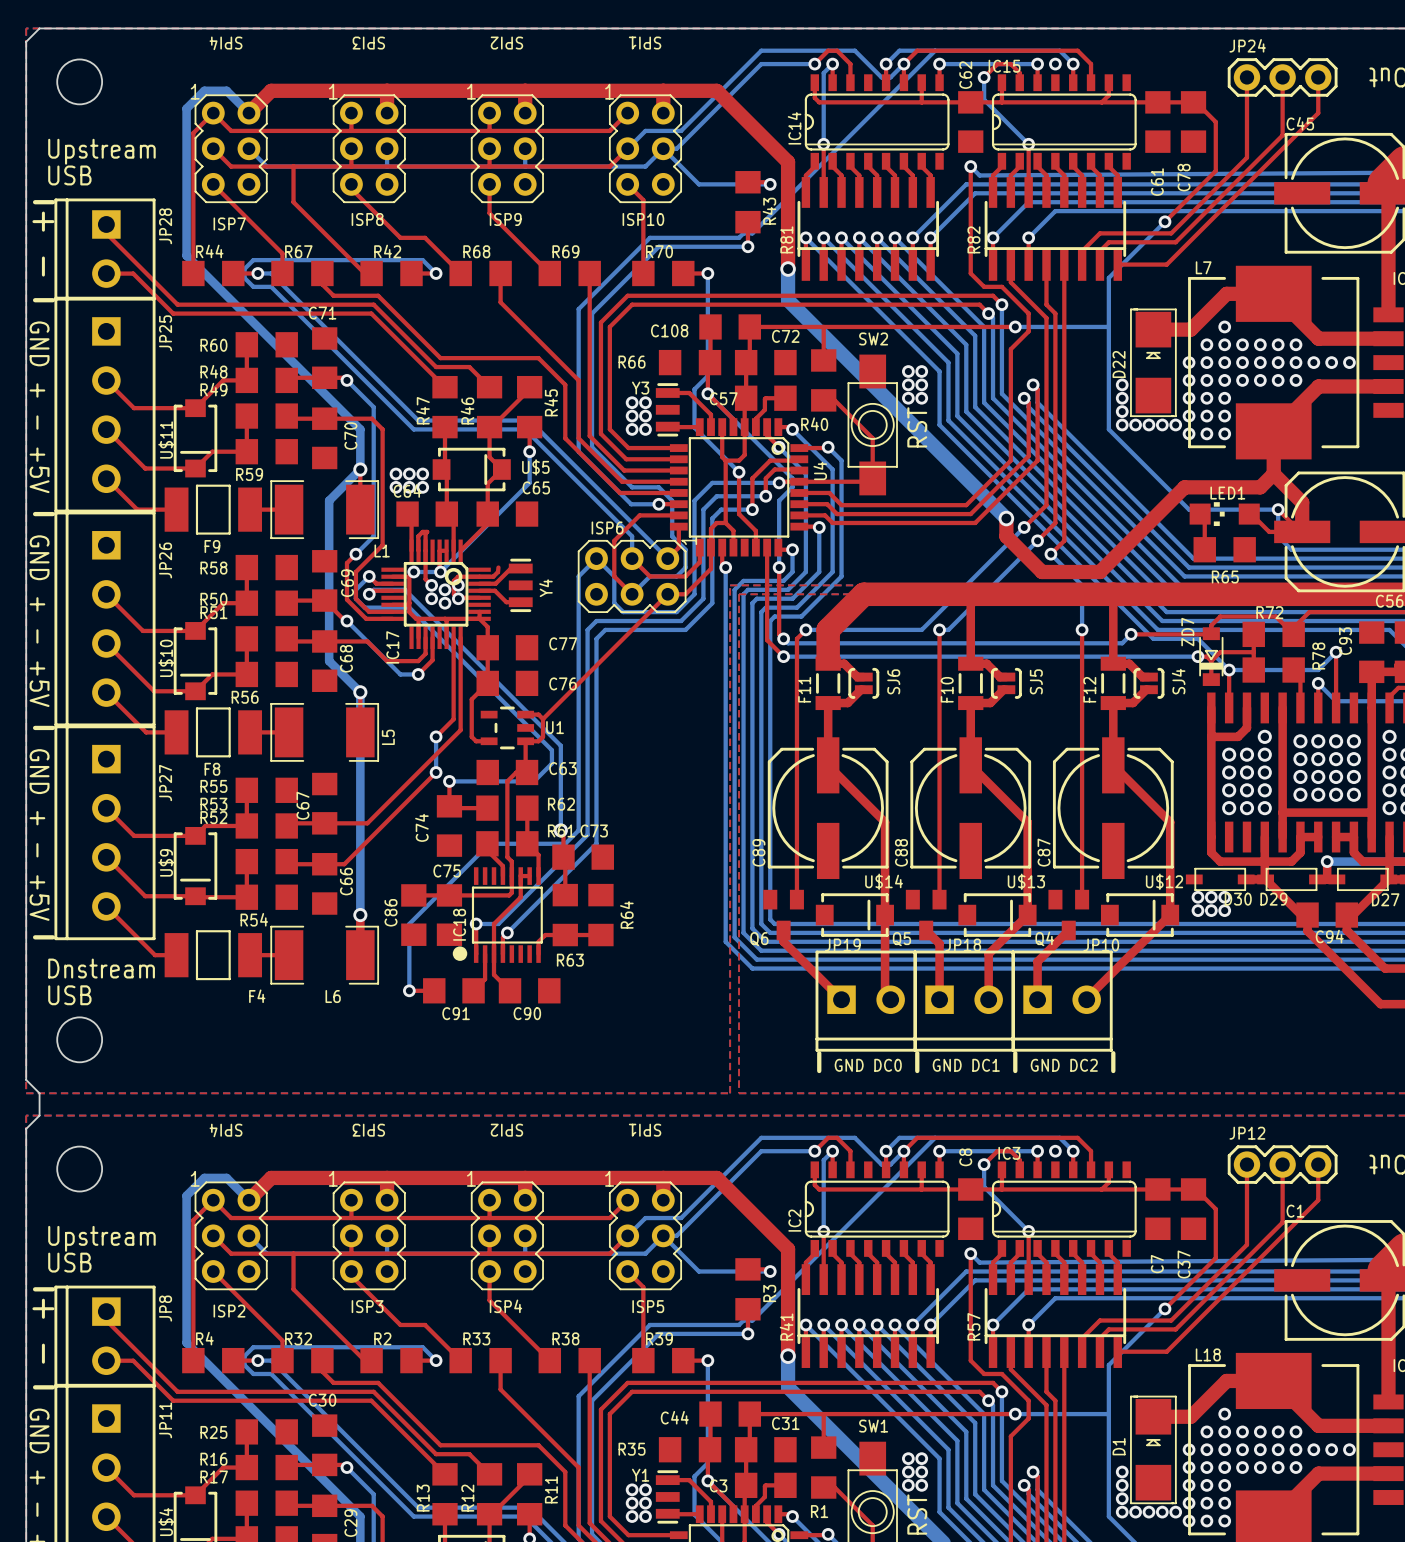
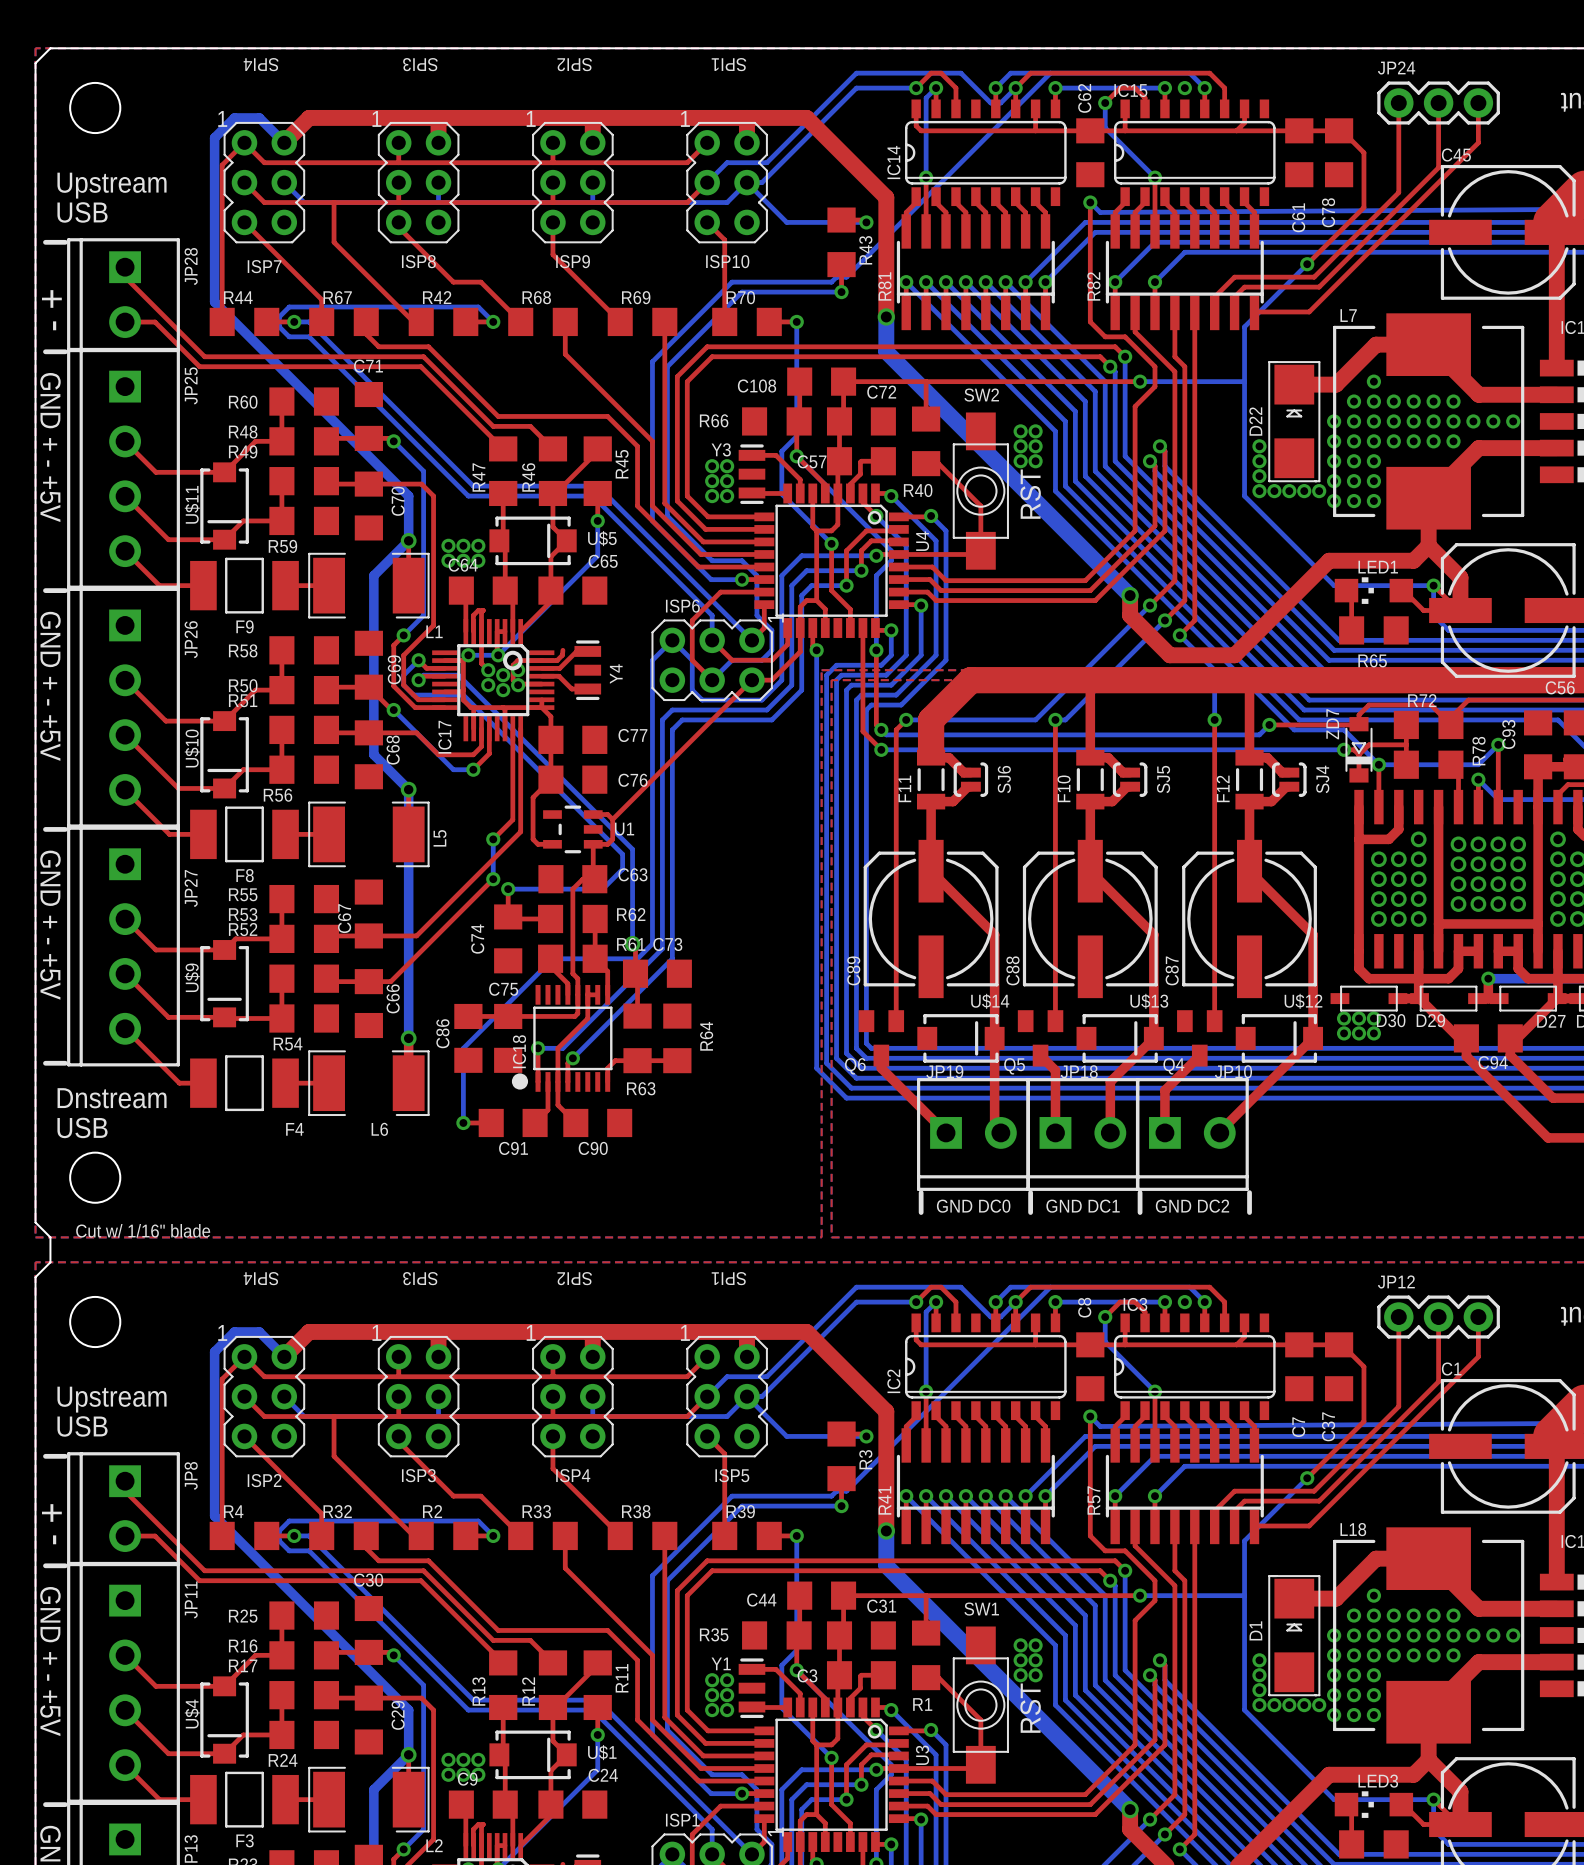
text: none -> Cut w/ 1/16" blade (143, 1230)

